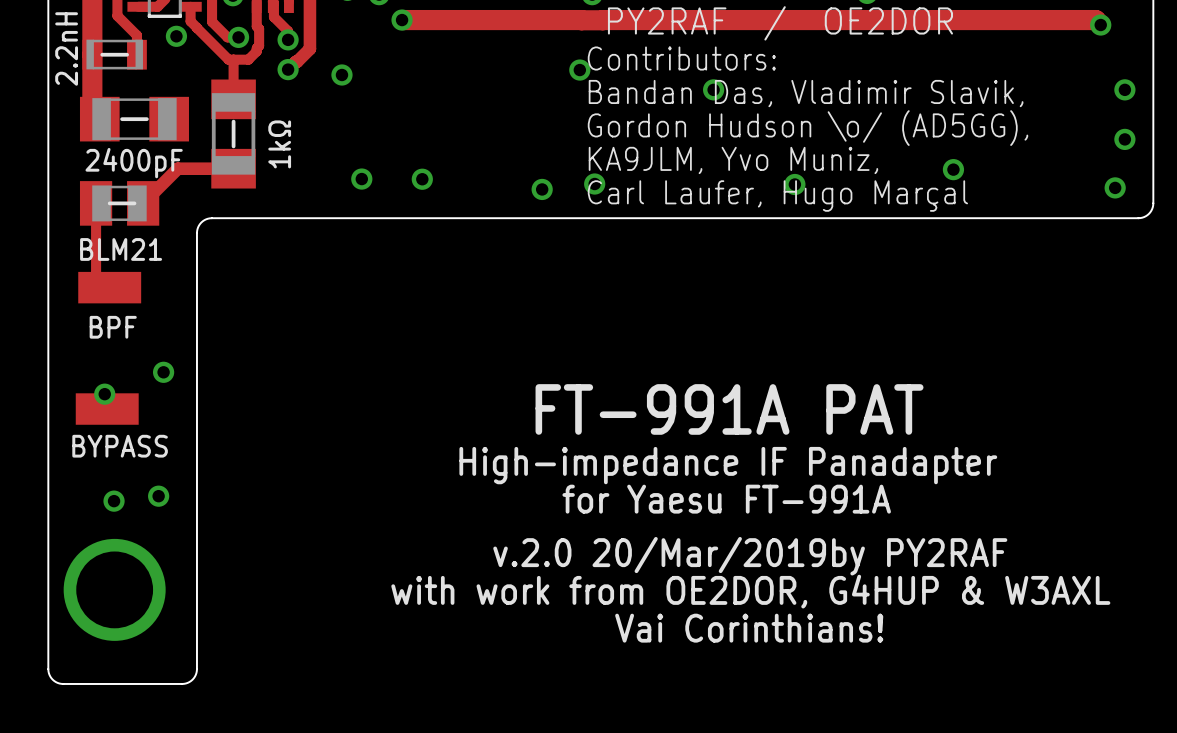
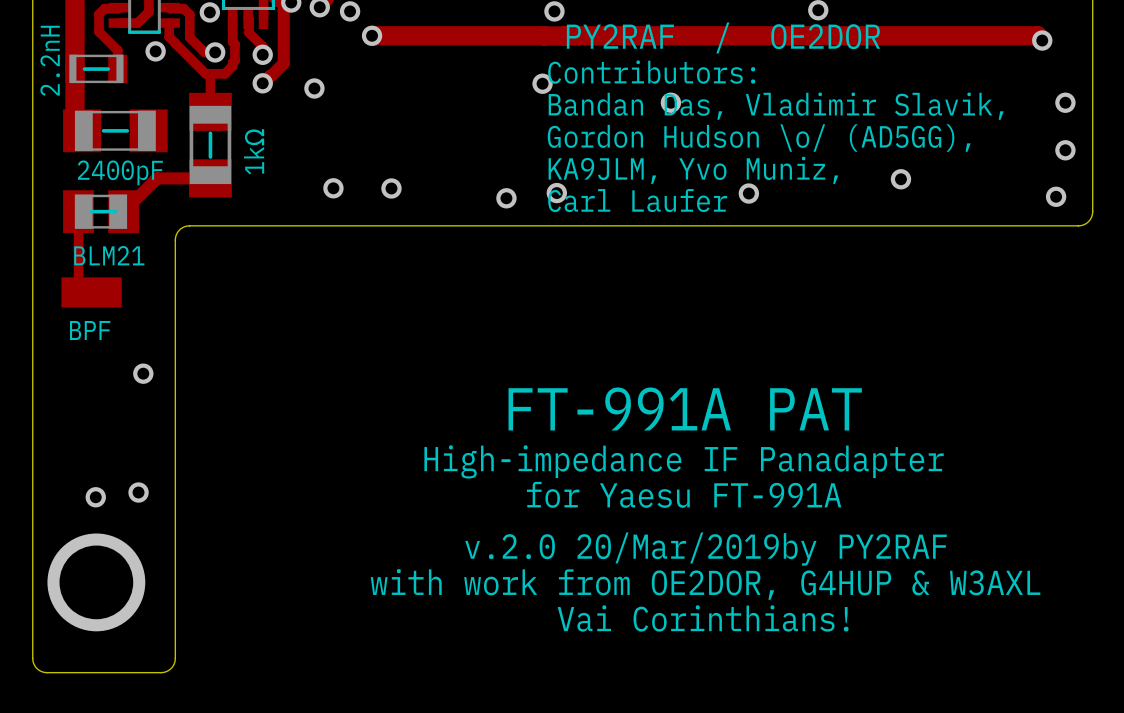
text: Carl Laufer, Hugo Marçal (777, 196) -> Carl Laufer (637, 200)
via: (104, 394) -> none
part: (107, 409) -> none
text: BYPASS (120, 446) -> none

